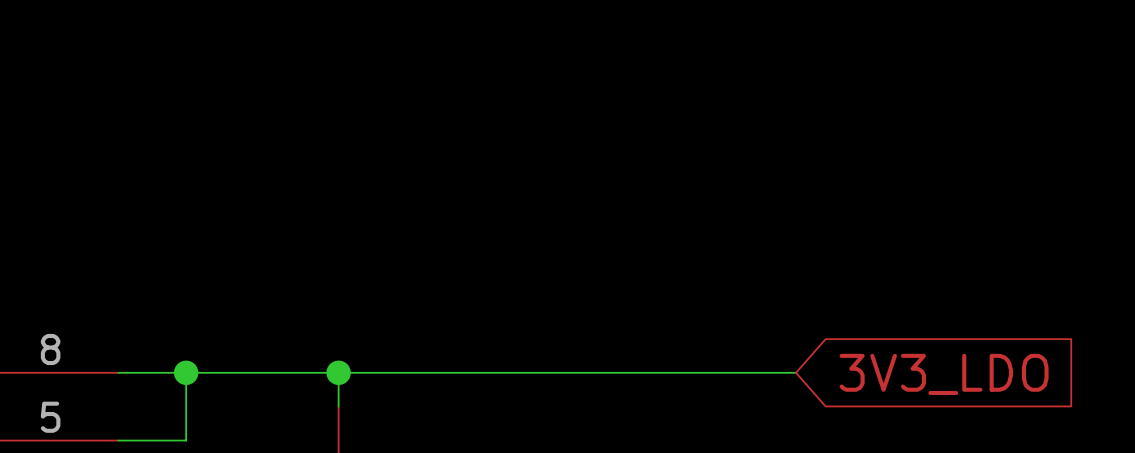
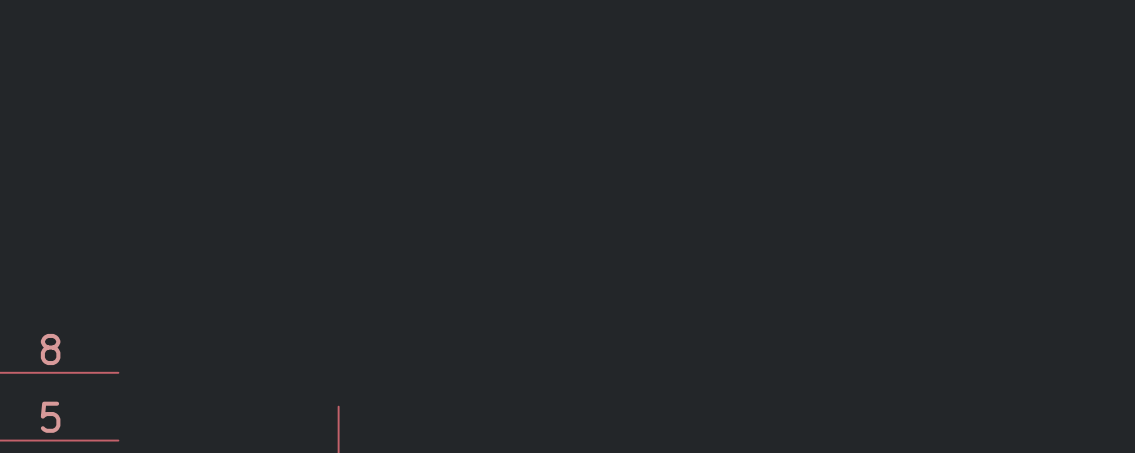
wire: (118, 372) (796, 372) -> none
wire: (186, 372) (186, 440) (118, 440) -> none
junction: (186, 372) -> none
wire: (338, 372) (338, 406) -> none
junction: (338, 372) -> none
global label: 3V3_LDO (944, 374) -> none

